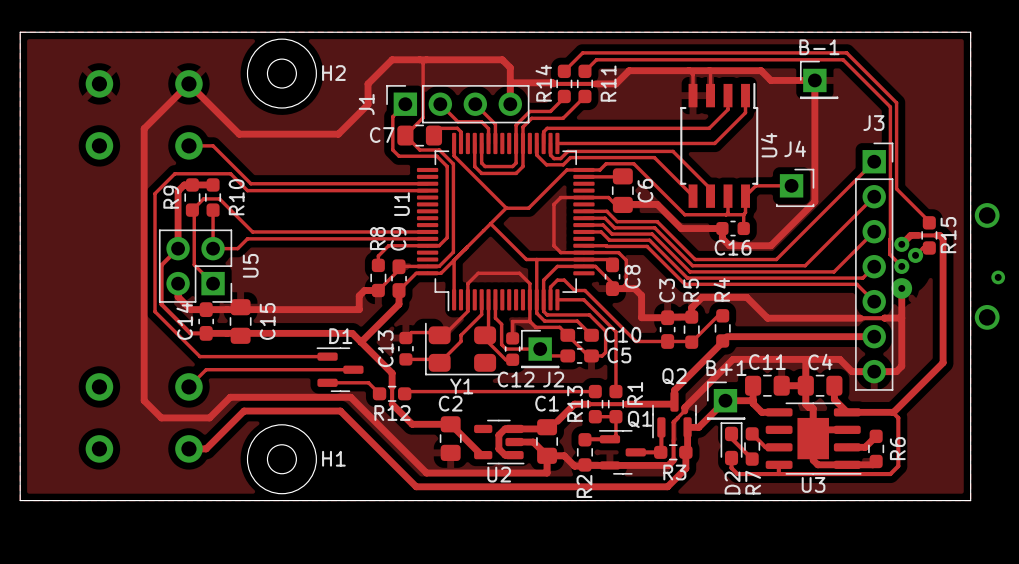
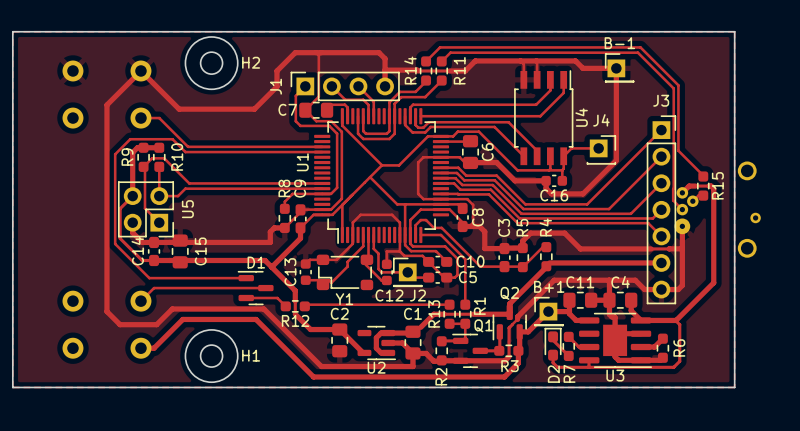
Y1 footprint: [425, 322, 500, 376] -> [316, 254, 374, 291]

